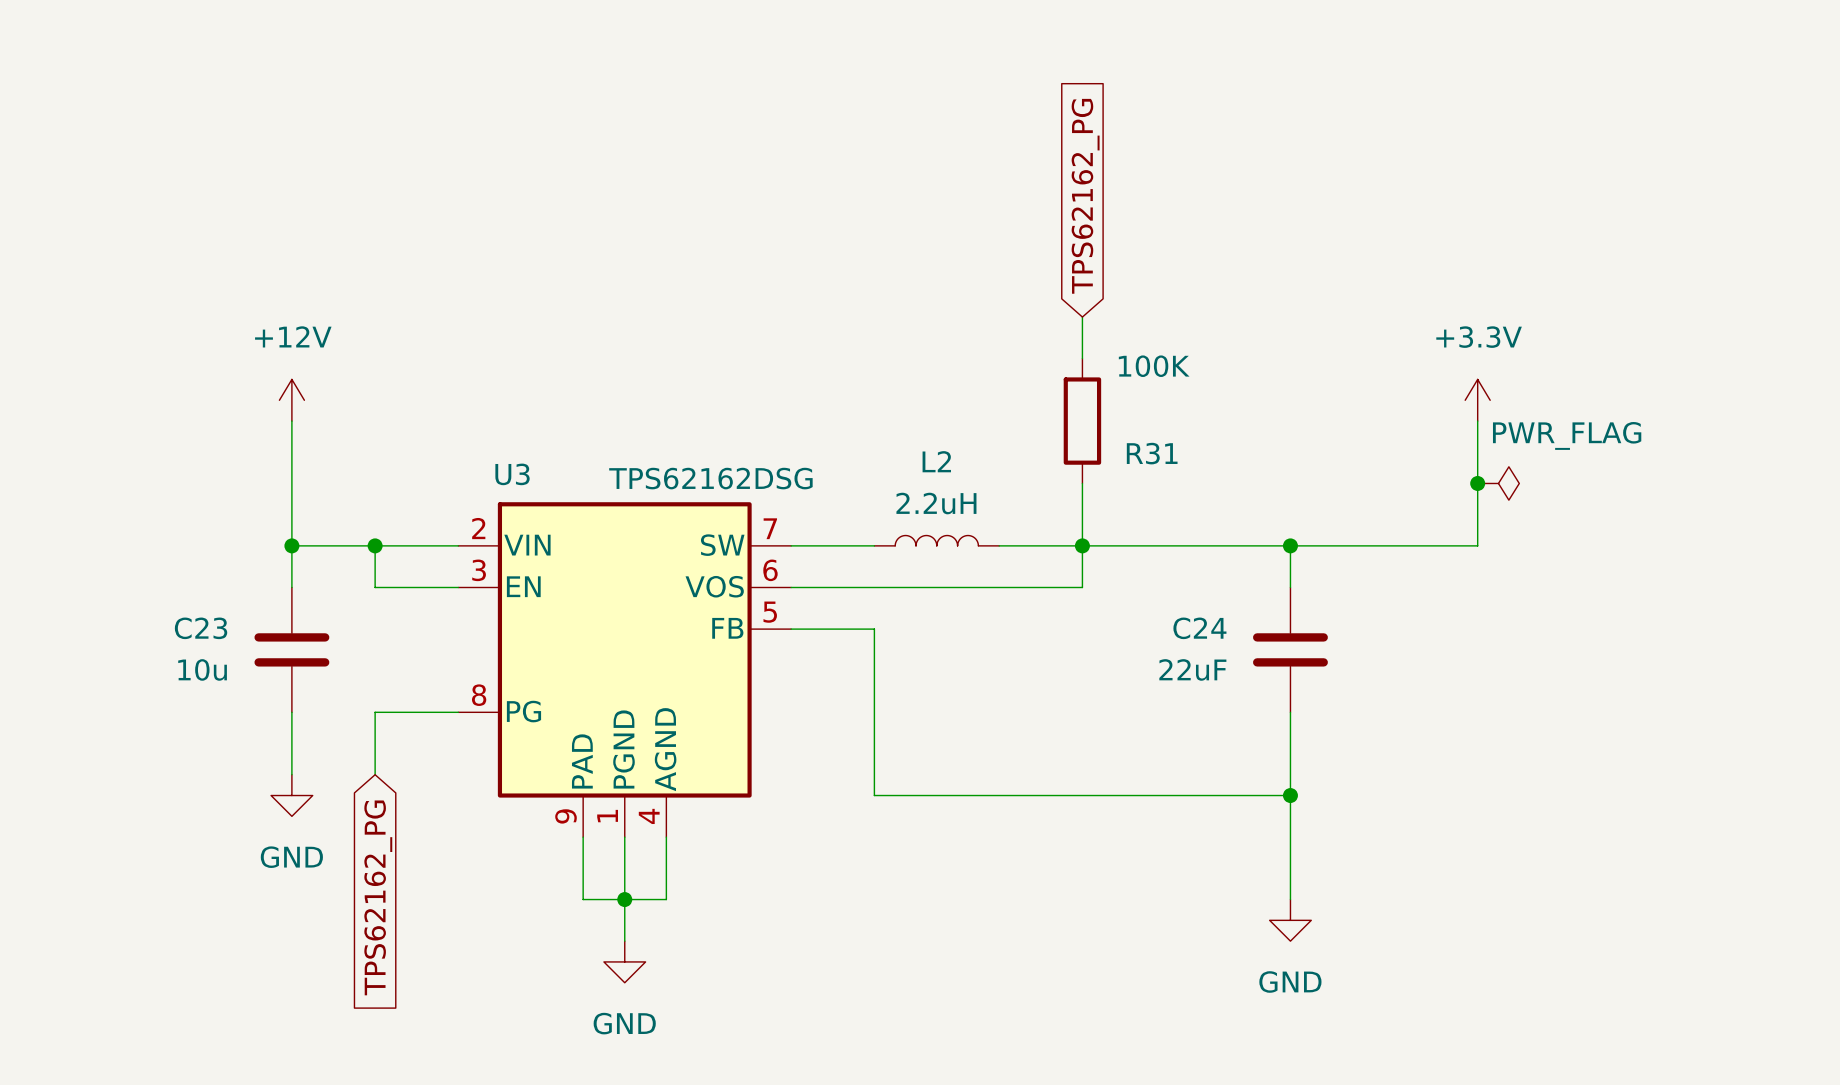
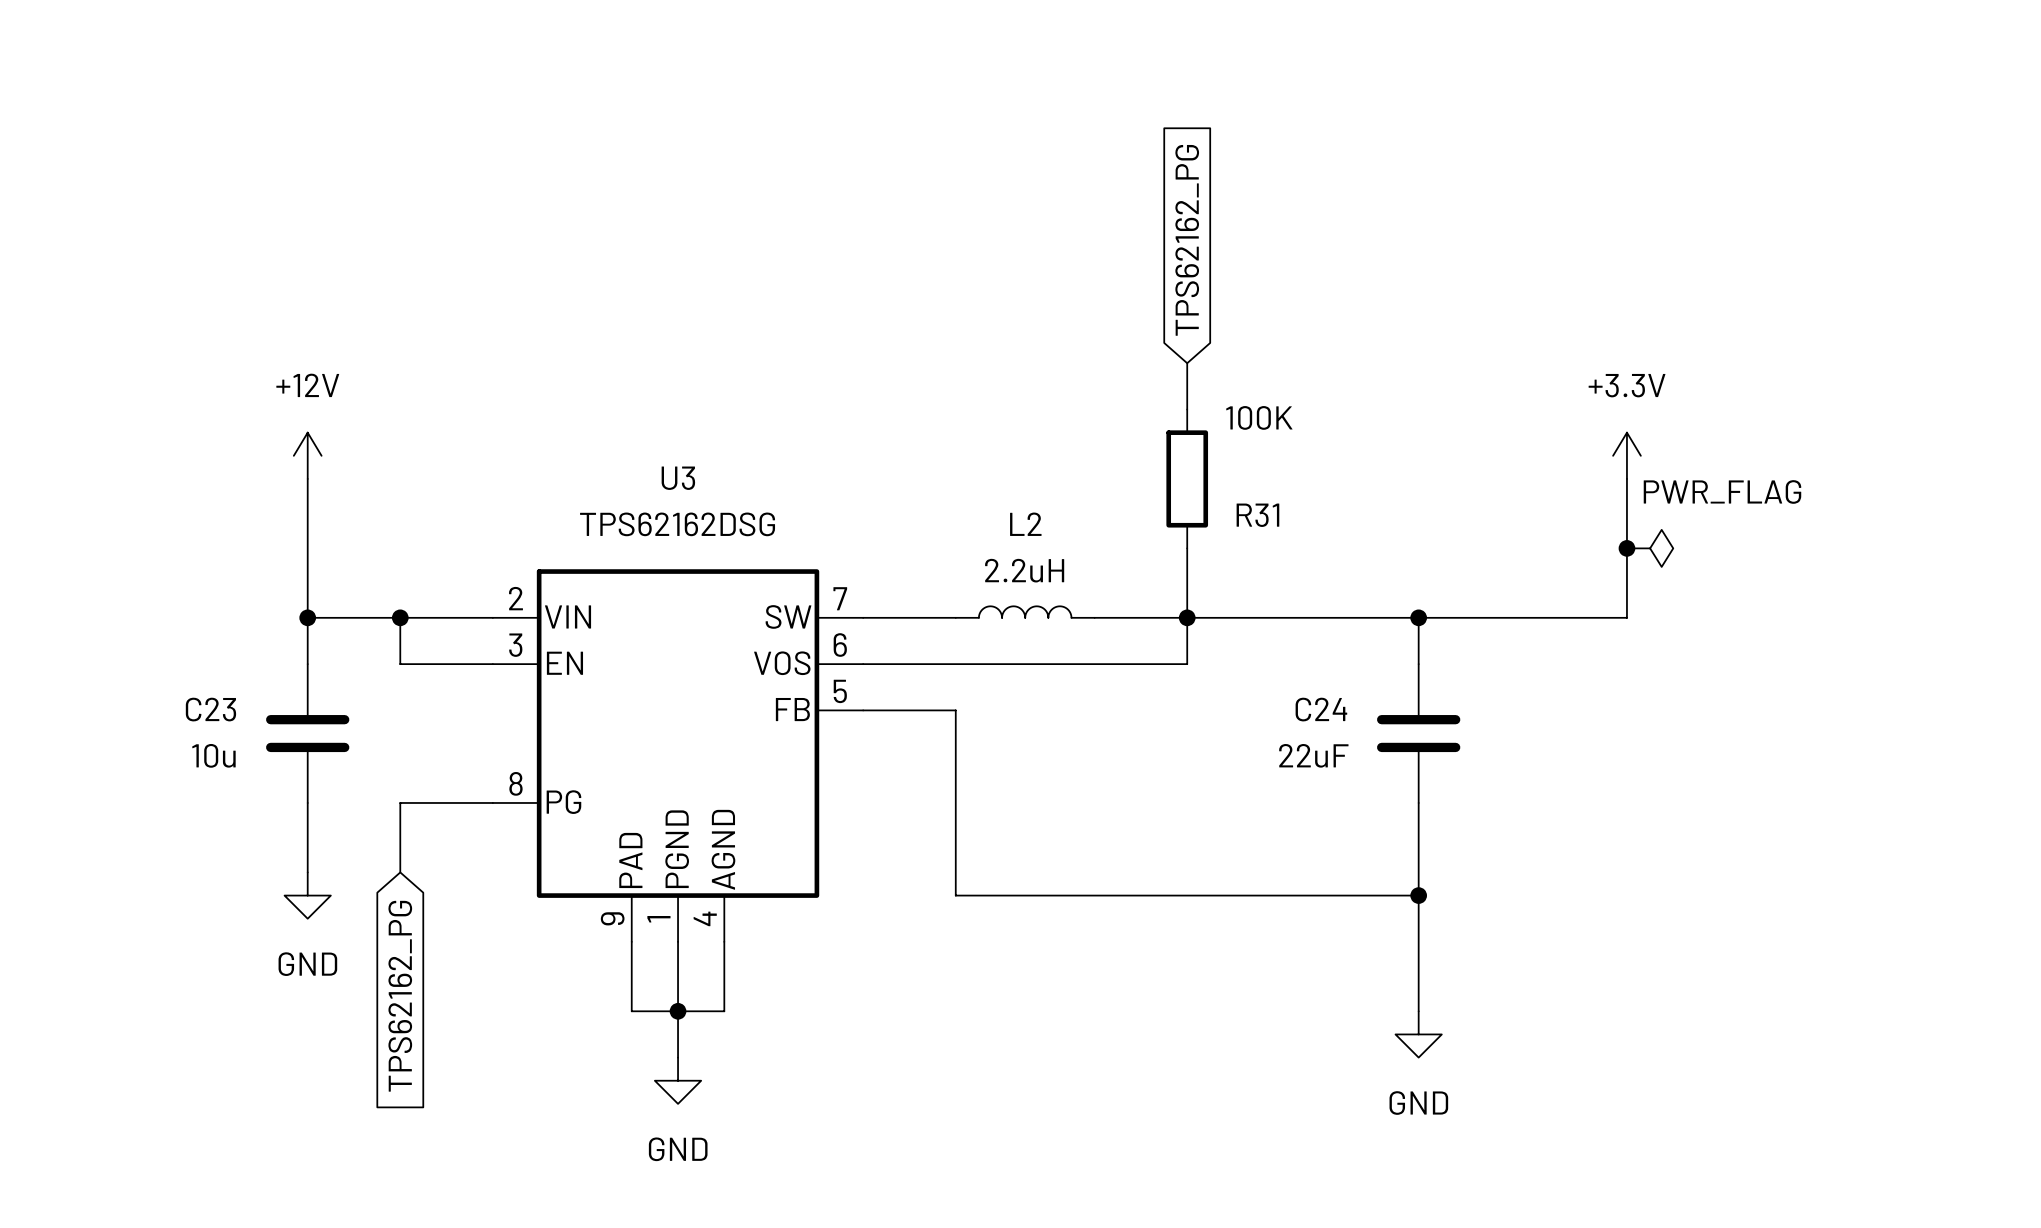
U3 name position: U3 (512, 474) -> U3 (678, 478)
U3 value position: TPS62162DSG (710, 478) -> TPS62162DSG (677, 524)

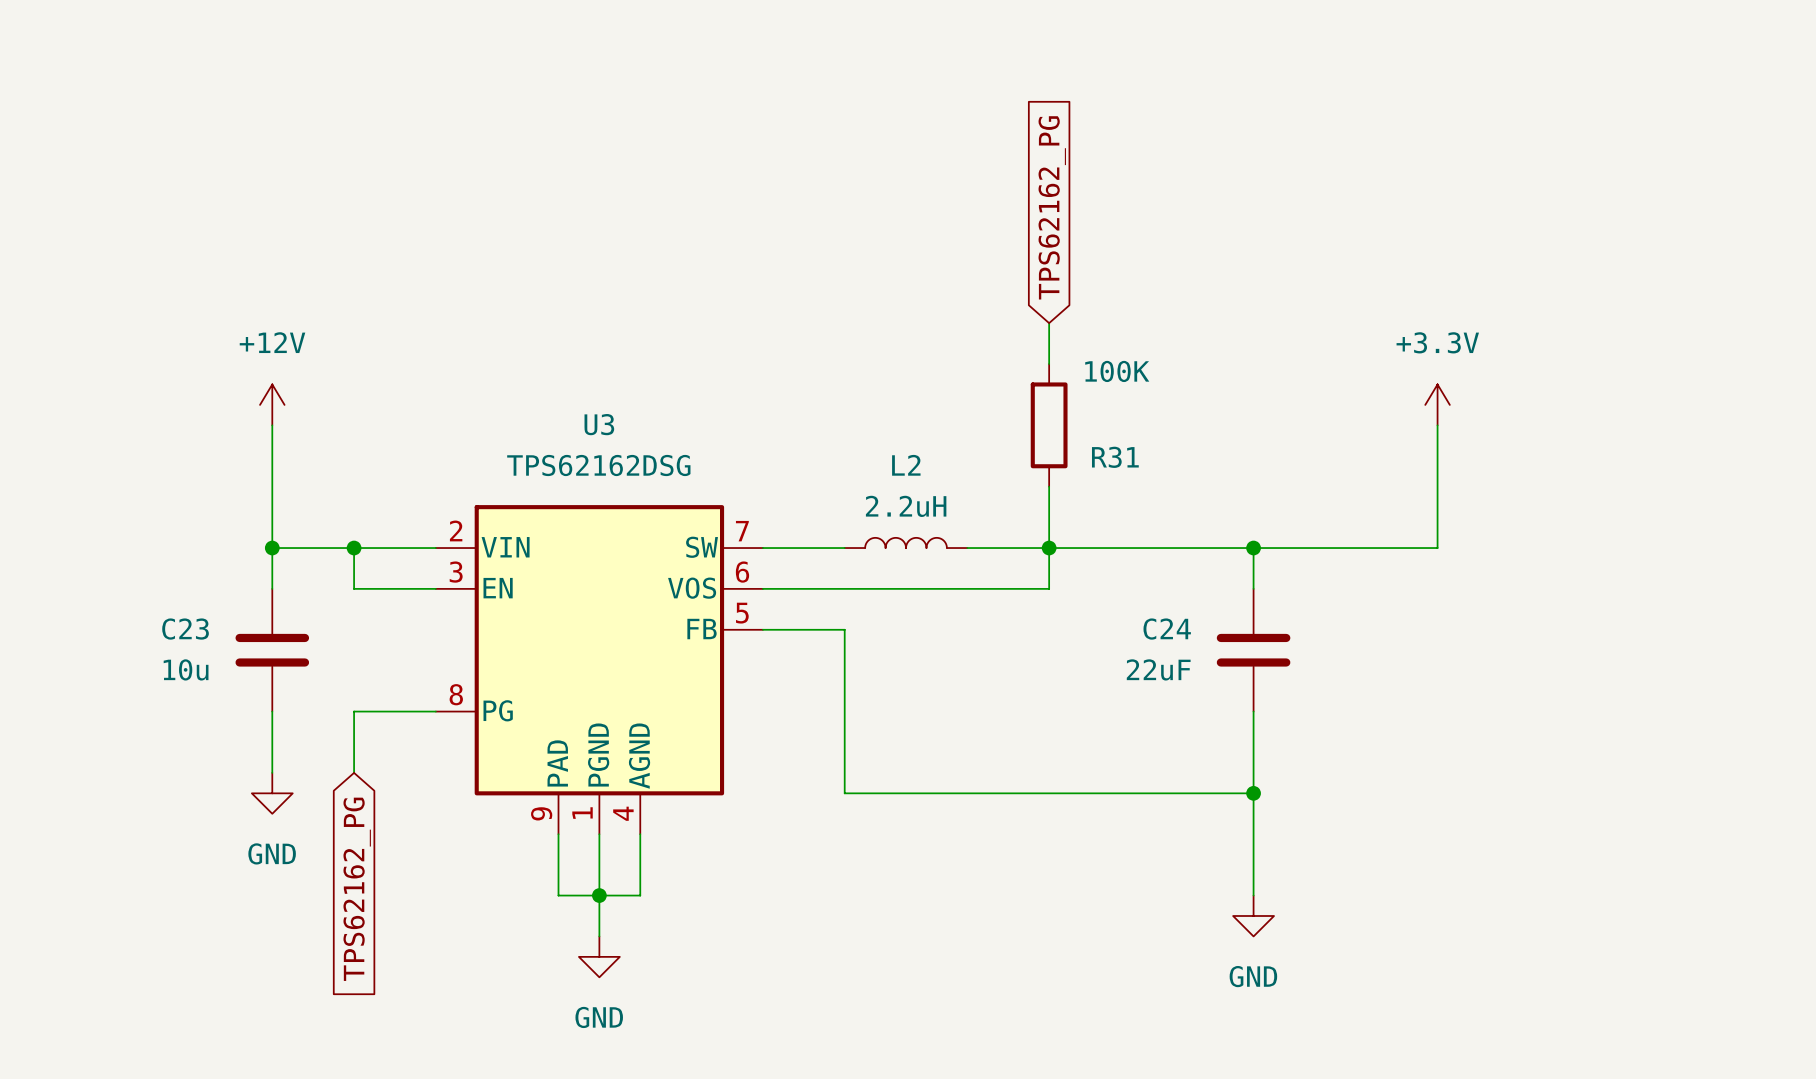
junction: (1626, 548) -> none
power symbol: PWR_FLAG (1650, 548) -> none

